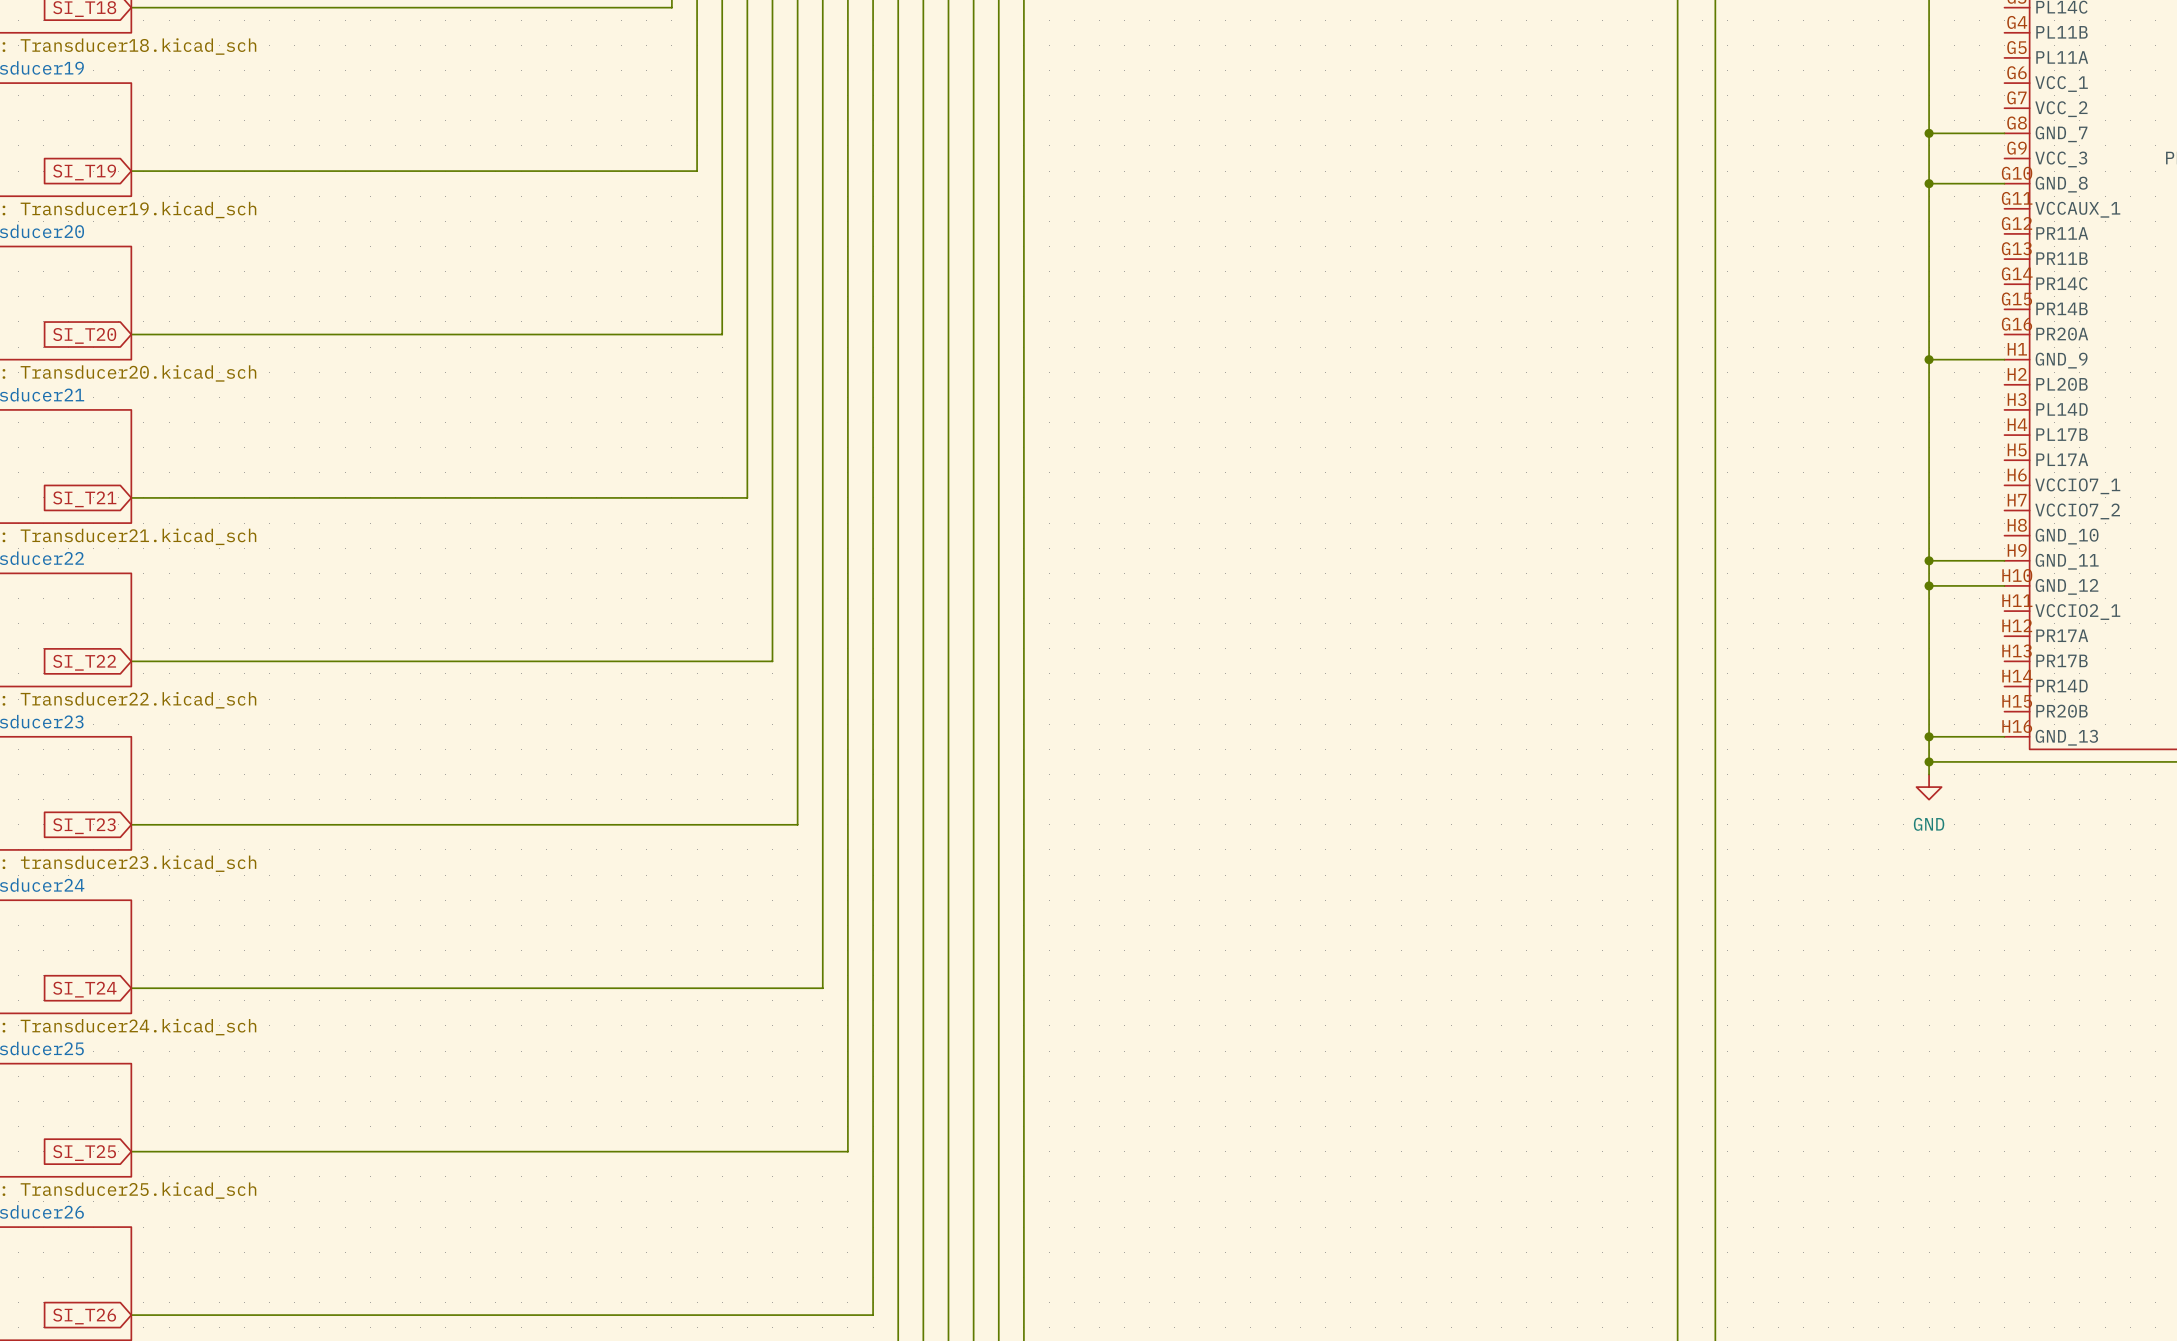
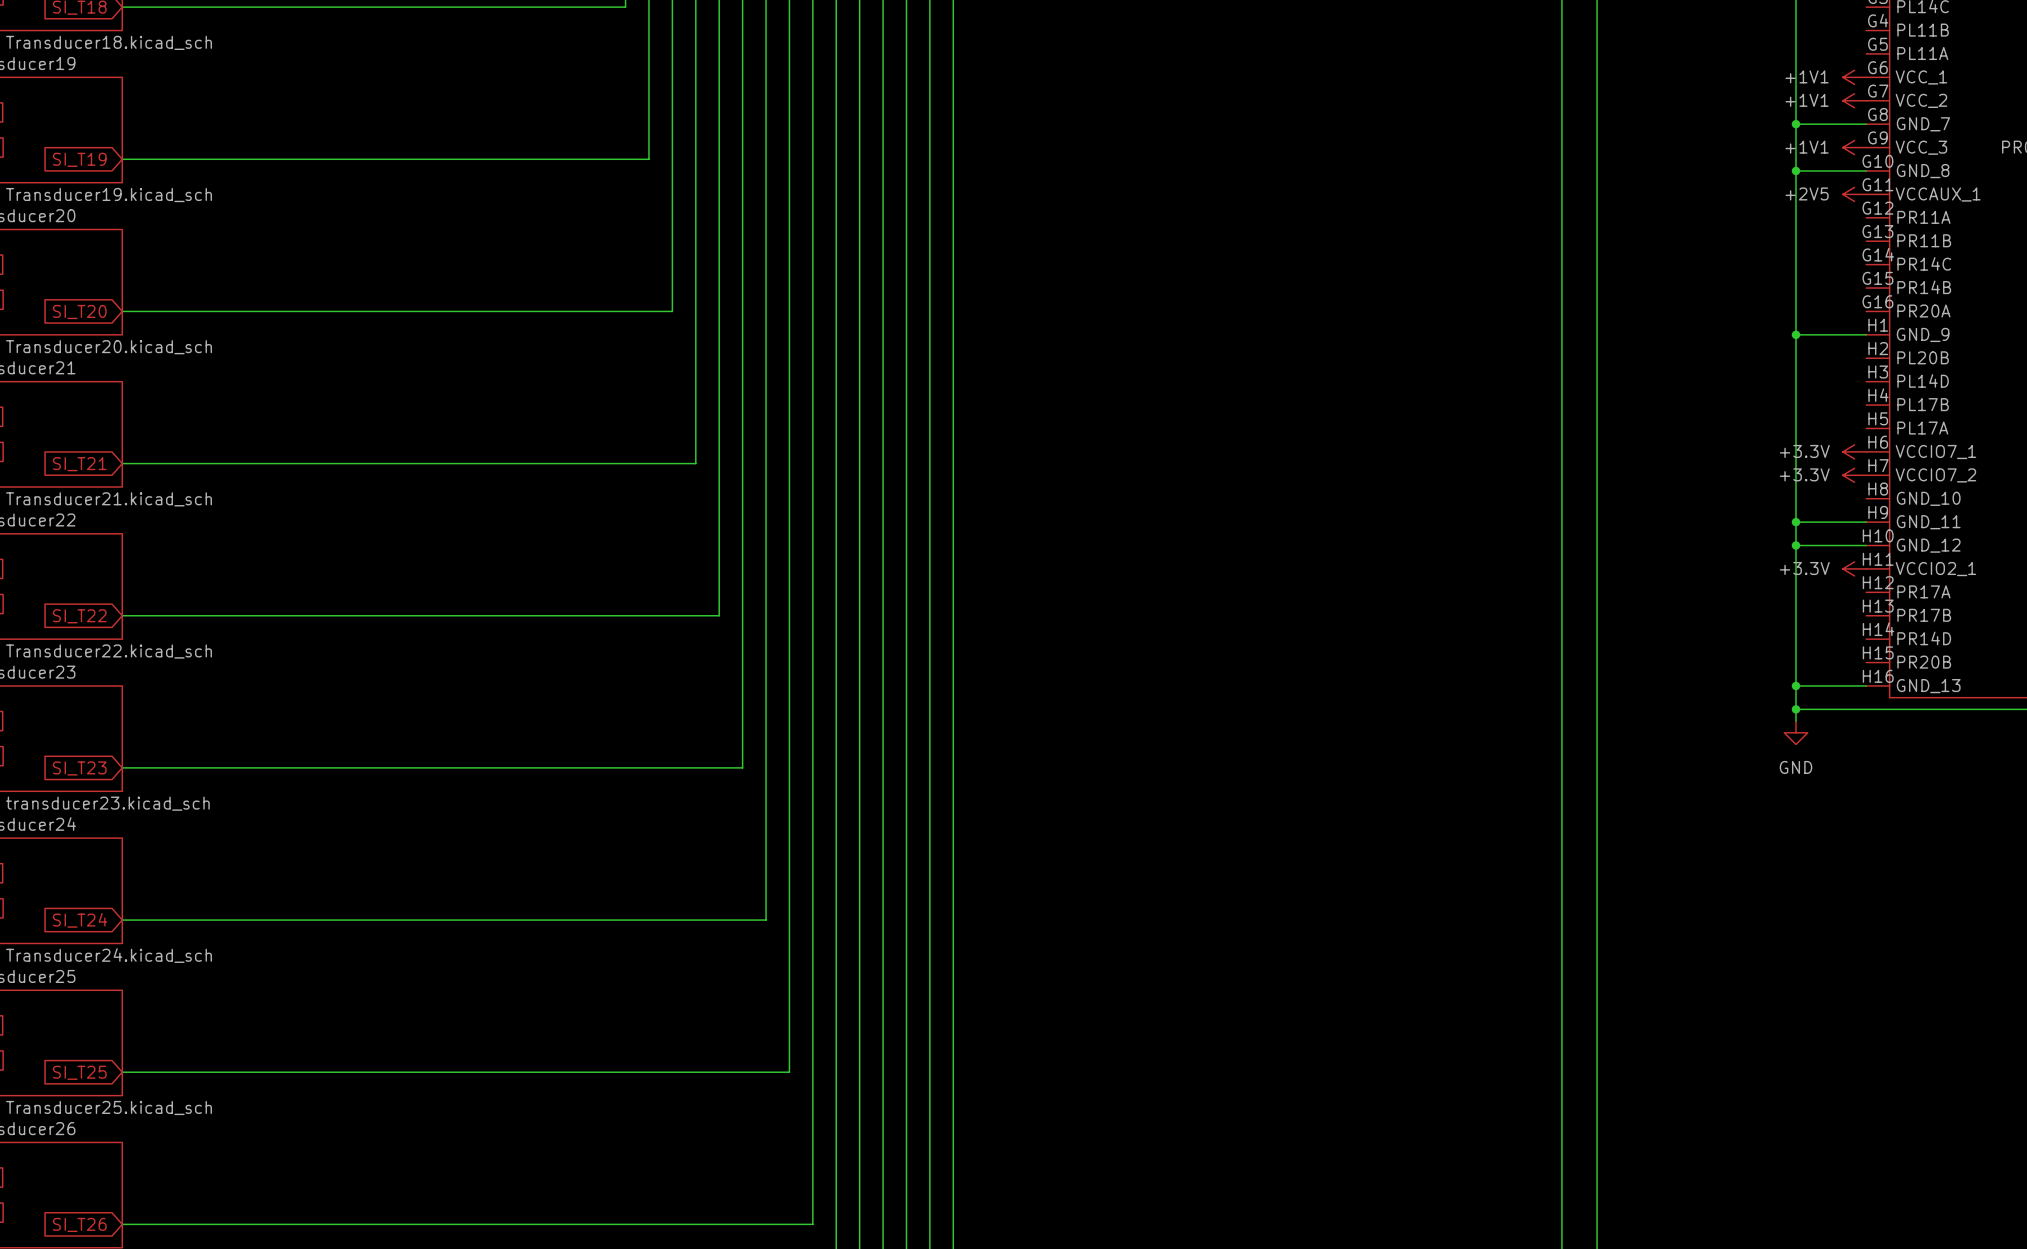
power symbol: none -> +1V1 (1854, 77)
power symbol: none -> +1V1 (1854, 100)
power symbol: none -> +1V1 (1854, 147)
power symbol: none -> +2V5 (1854, 194)
power symbol: none -> +3.3V (1854, 451)
power symbol: none -> +3.3V (1854, 475)
power symbol: none -> +3.3V (1854, 568)

